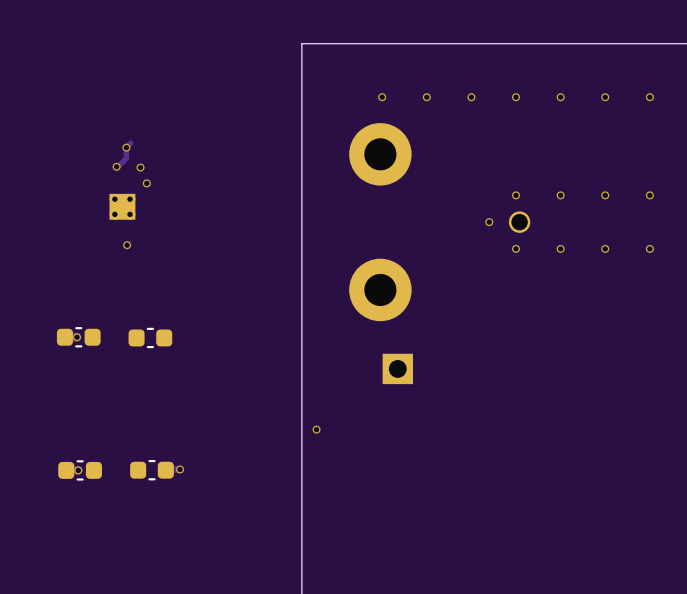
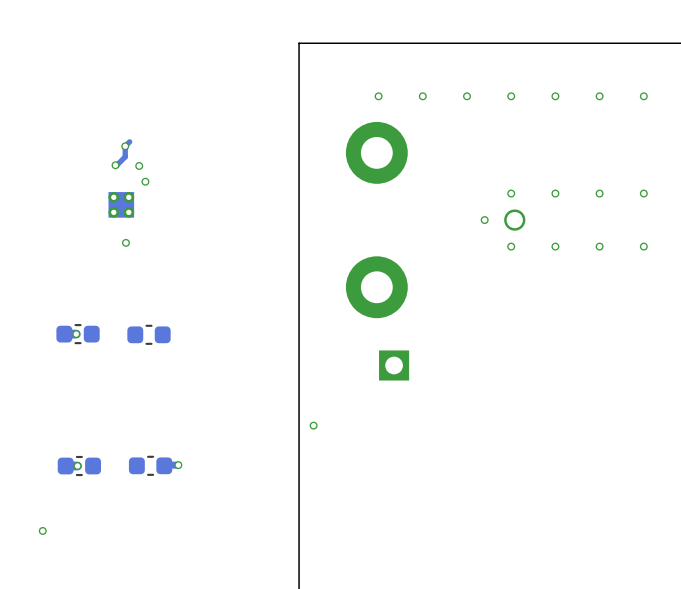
via: none -> (42, 530)

